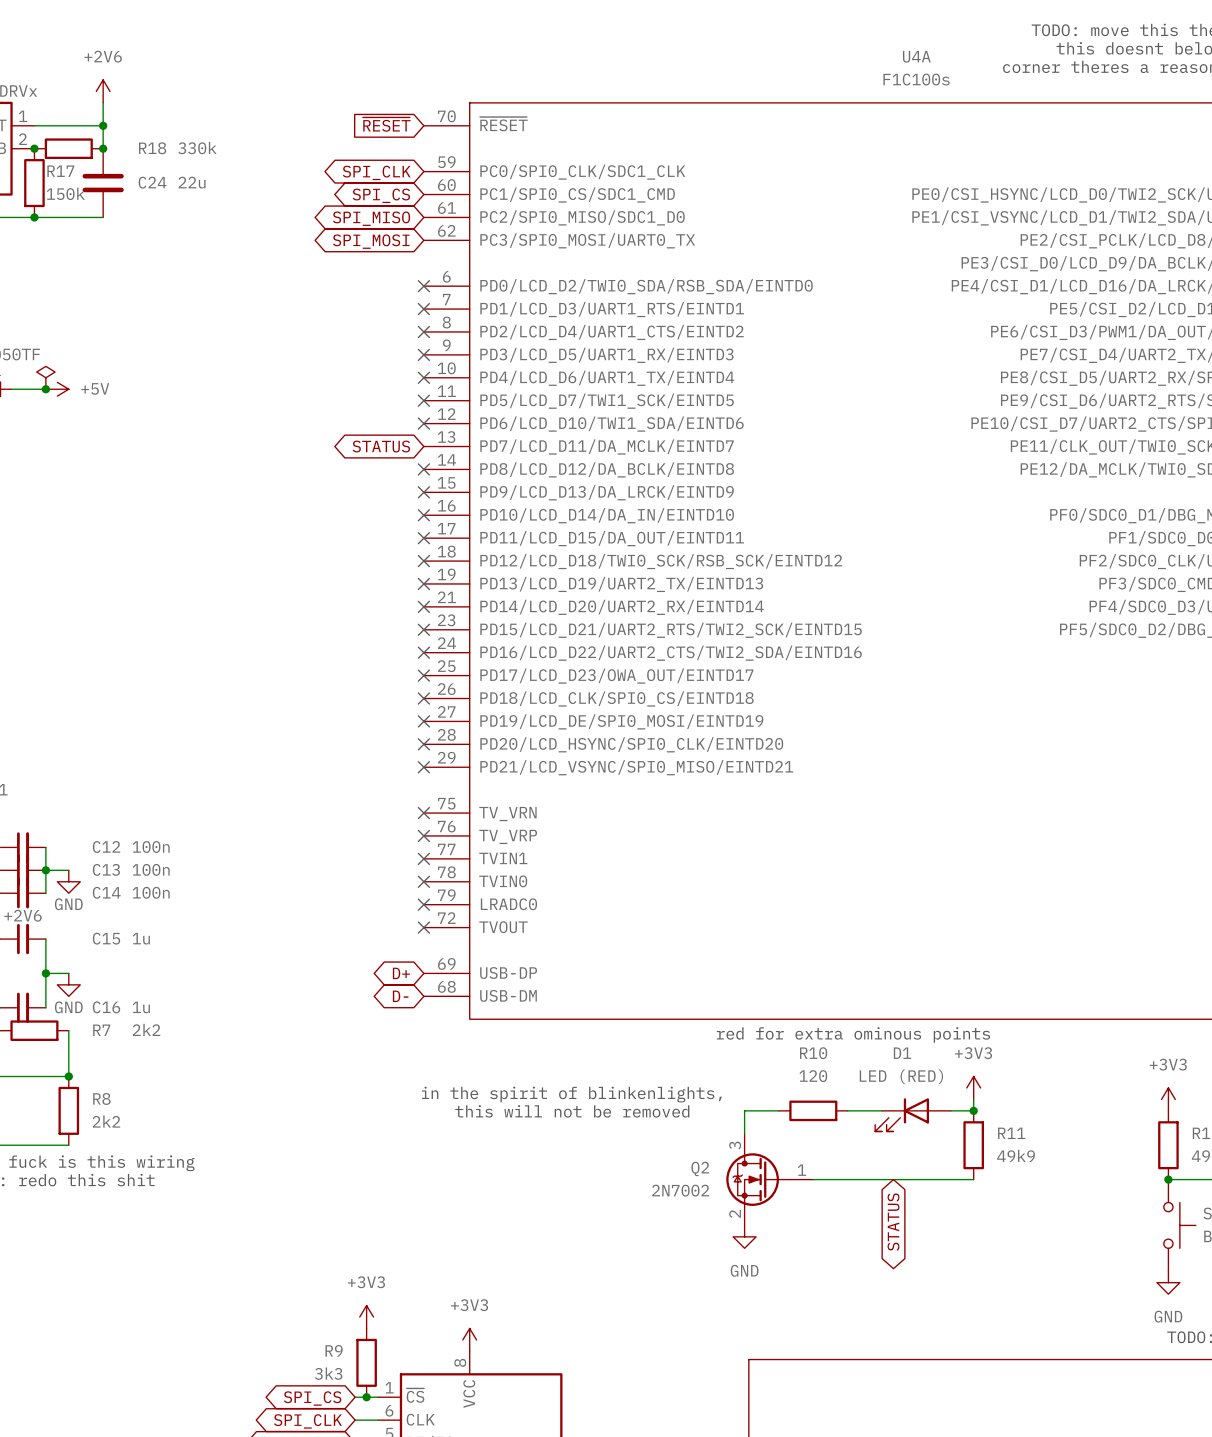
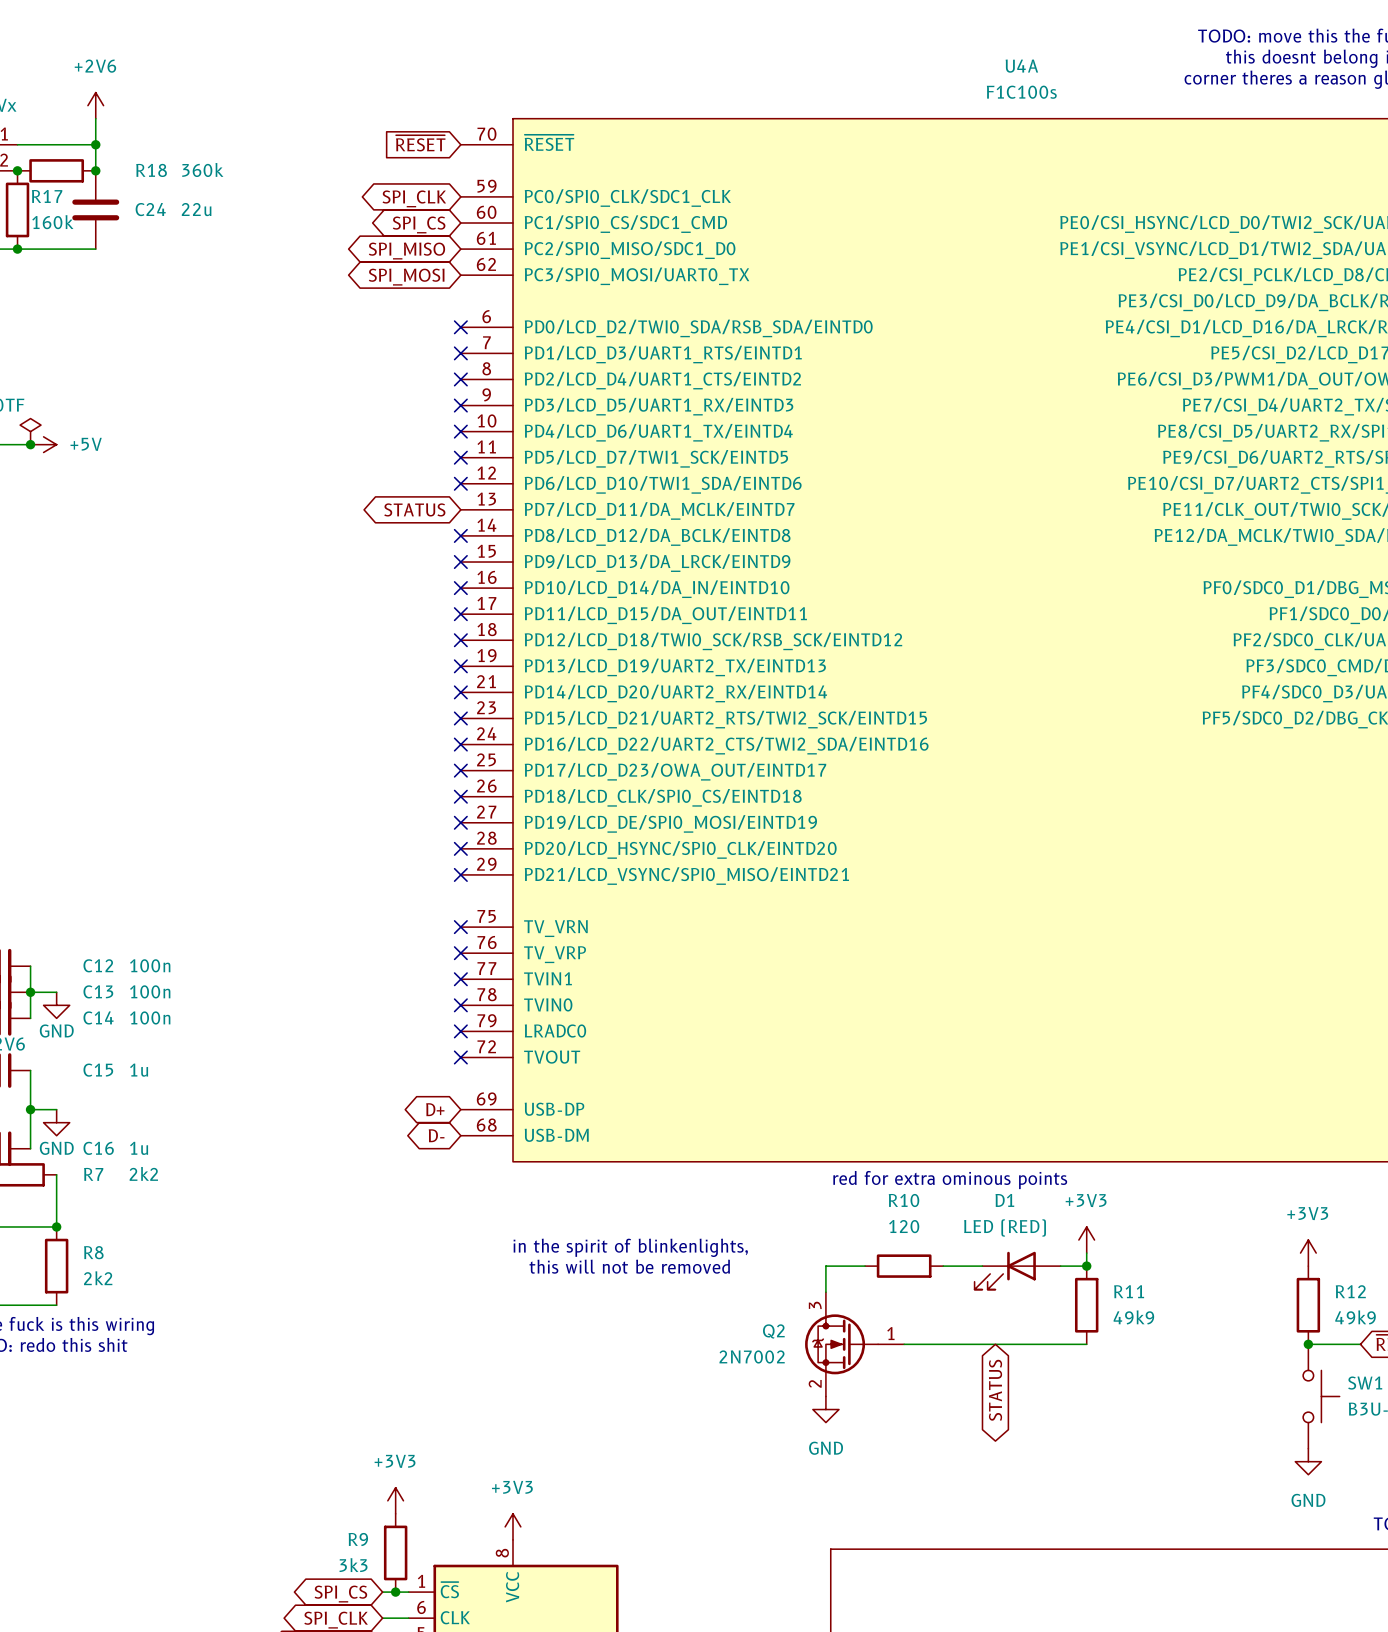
R18 value: 330k (197, 148) -> 360k (202, 170)
R17 value: 150k (65, 193) -> 160k (52, 222)

